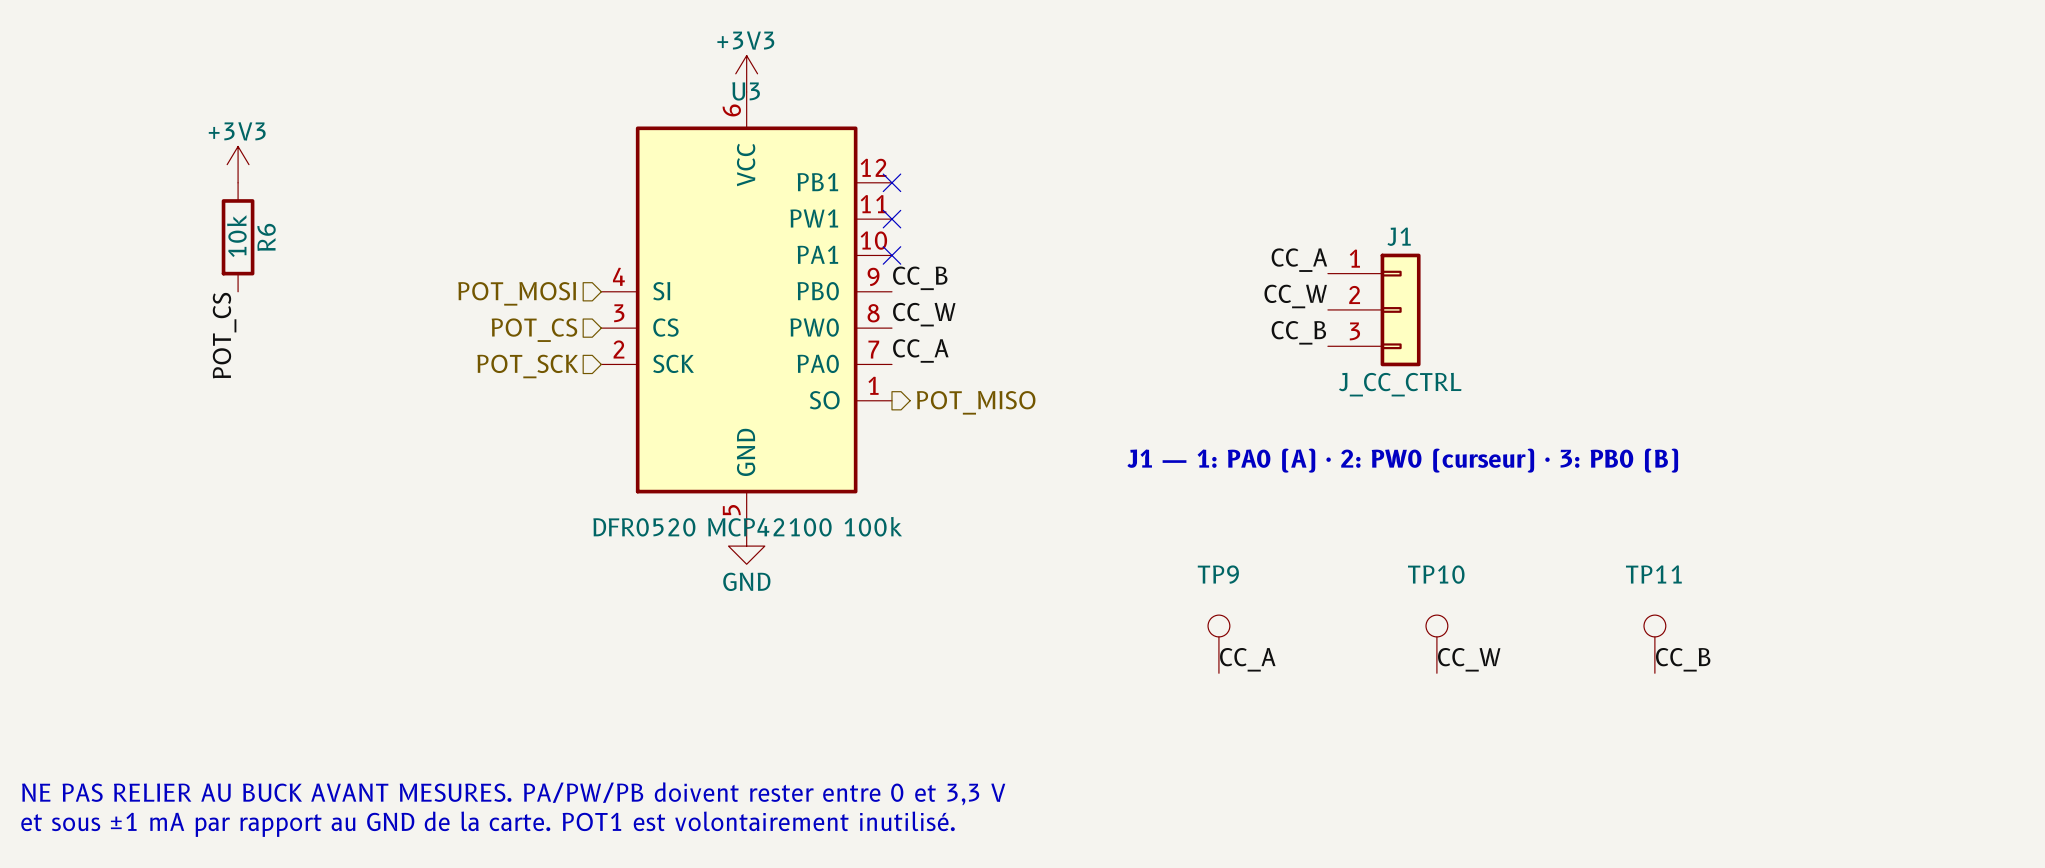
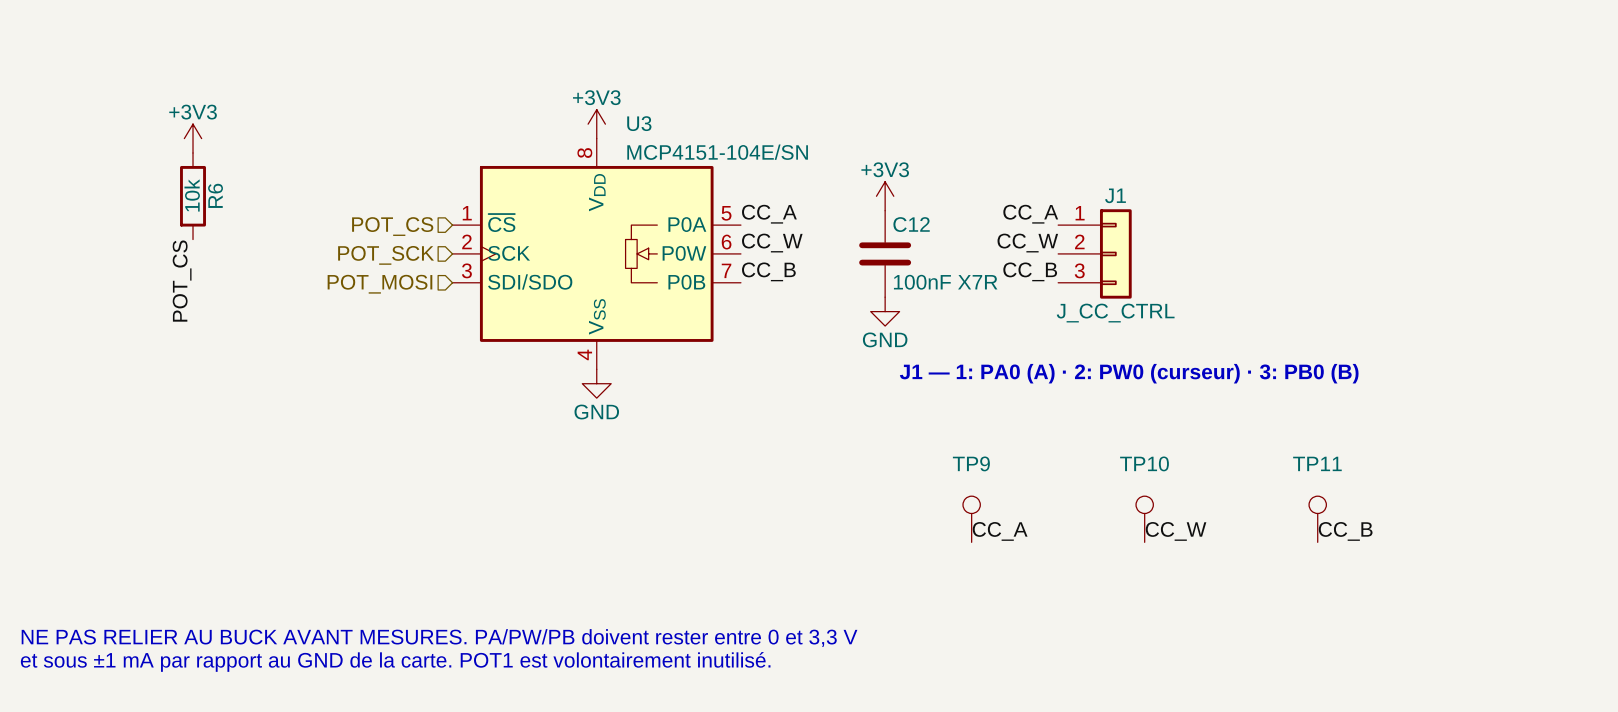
power symbol position: +3V3 (746, 73) -> +3V3 (596, 124)
U3 symbol: [601, 91, 892, 528] -> [452, 138, 741, 370]
U3 name position: U3 (746, 91) -> U3 (639, 123)
no-connect mark: (891, 182) -> none
no-connect mark: (891, 219) -> none
power symbol: none -> +3V3 (885, 196)
no-connect mark: (891, 255) -> none
label position: CC_B (920, 278) -> CC_B (768, 271)
hierarchical label position: POT_MOSI (517, 293) -> POT_MOSI (379, 284)
C12: none -> 100nF X7R (885, 253)
label position: CC_W (924, 314) -> CC_W (772, 243)
hierarchical label position: POT_CS (534, 330) -> POT_CS (392, 226)
label position: CC_A (920, 350) -> CC_A (769, 214)
hierarchical label position: POT_SCK (527, 366) -> POT_SCK (386, 255)
power symbol: none -> GND (885, 311)
hierarchical label: POT_MISO (976, 402) -> none
U3 value: DFR0520 MCP42100 100k (747, 526) -> MCP4151-104E/SN (717, 152)
power symbol position: GND (746, 546) -> GND (596, 383)

